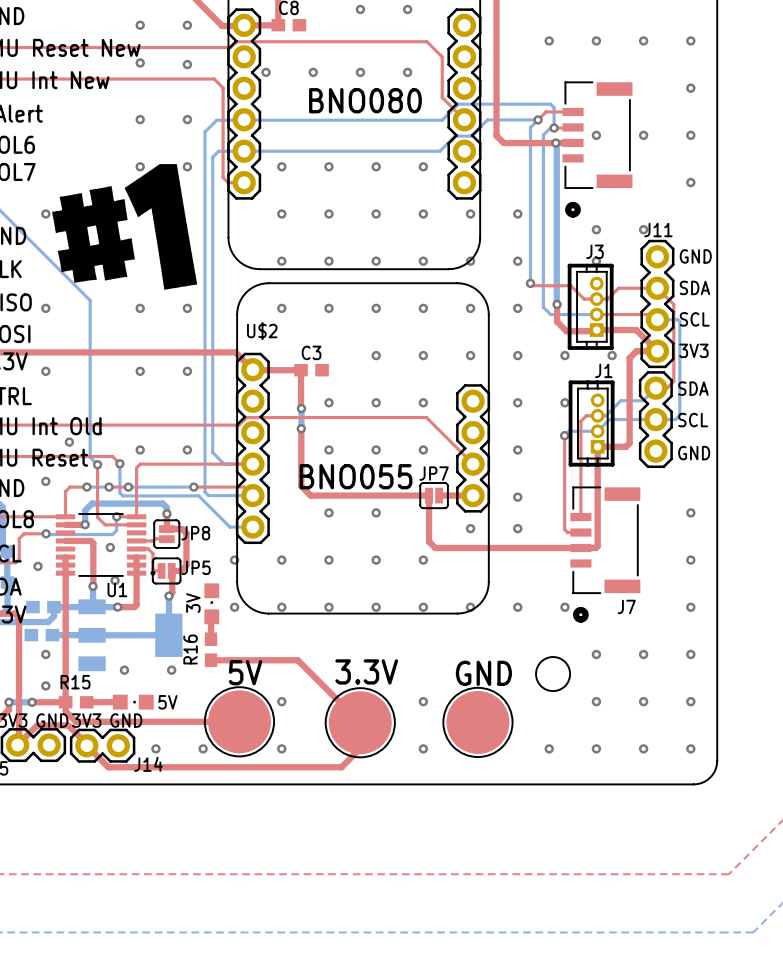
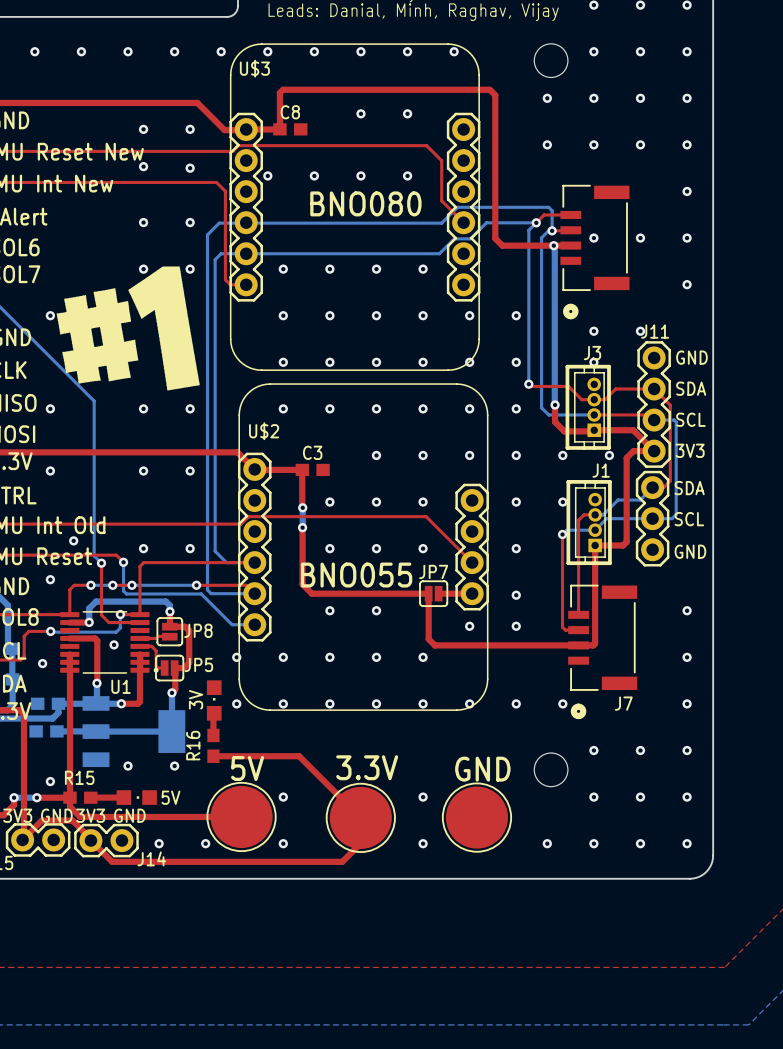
via: (115, 580) -> none
via: (45, 654) -> none

